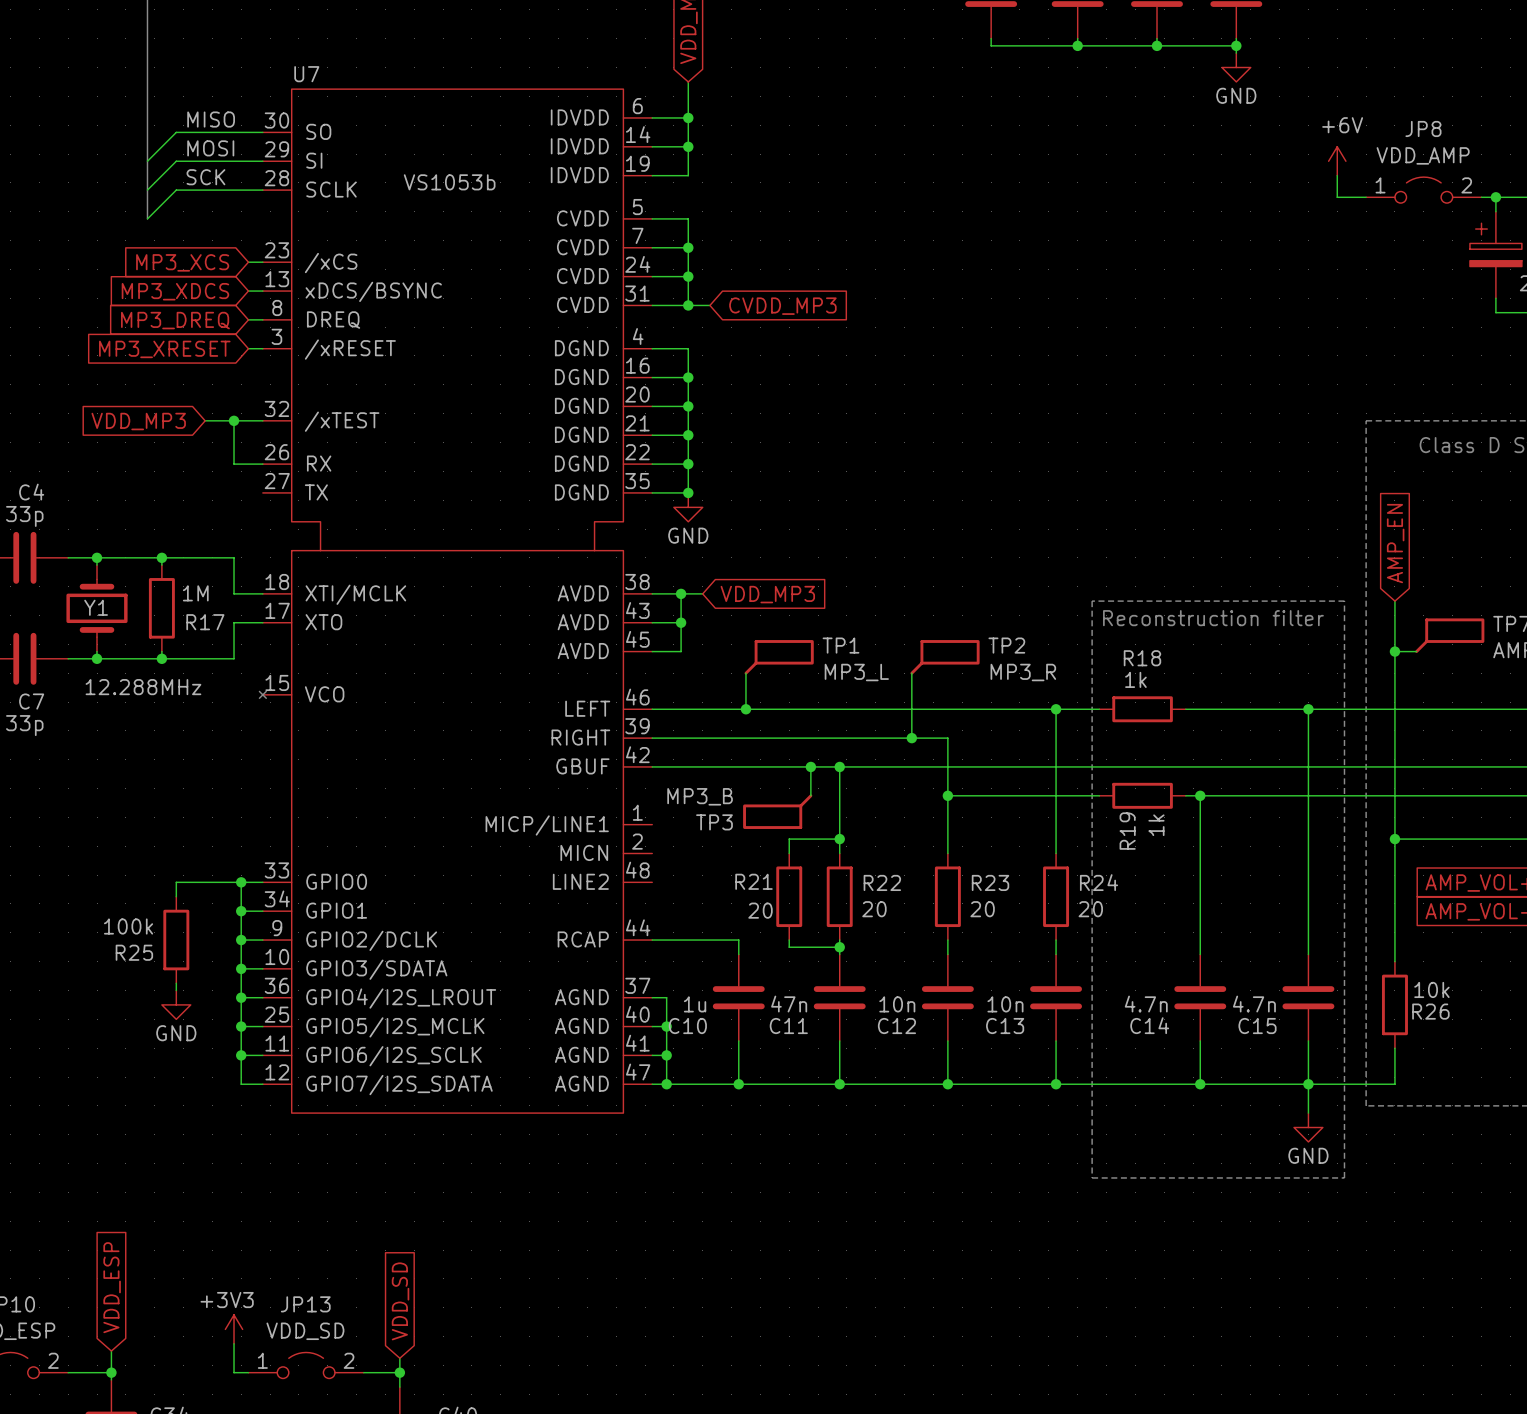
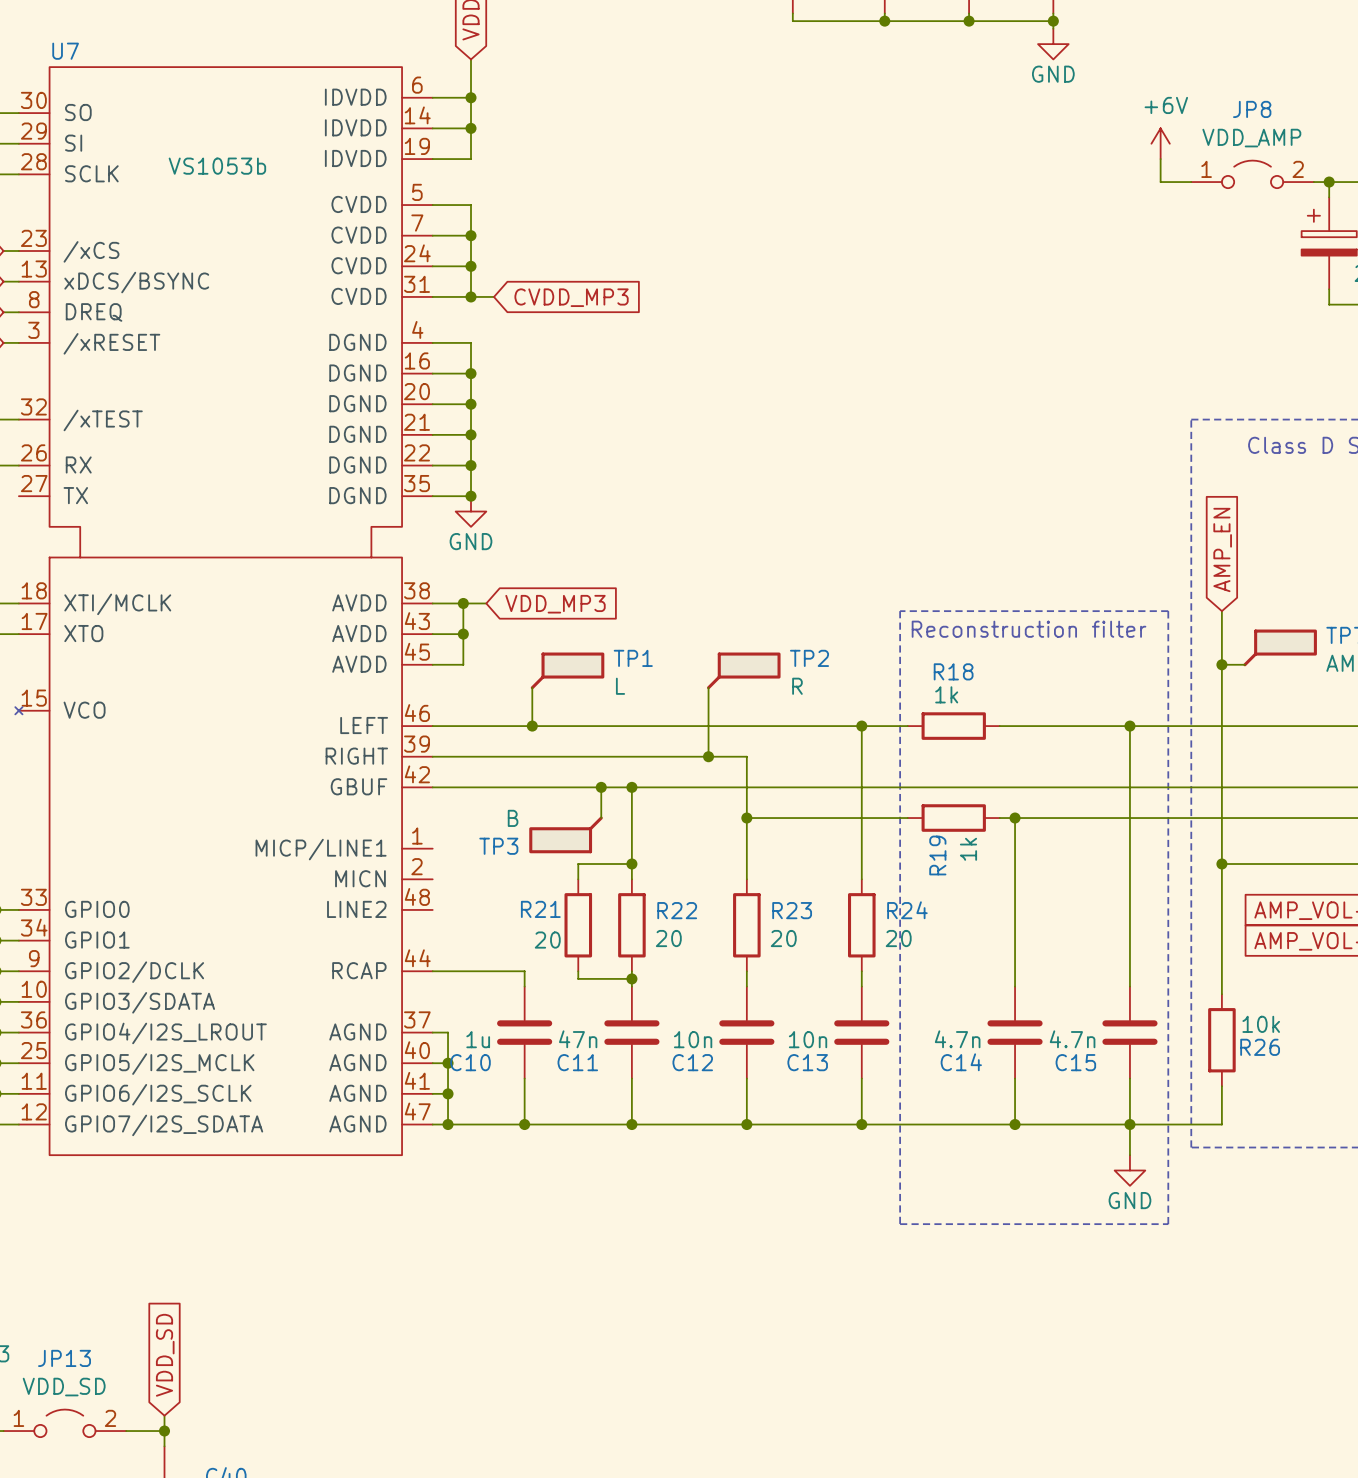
TP1 value: MP3_L (856, 672) -> L (620, 686)
TP2 value: MP3_R (1023, 672) -> R (797, 686)
TP3 value: MP3_B (700, 796) -> B (513, 818)

